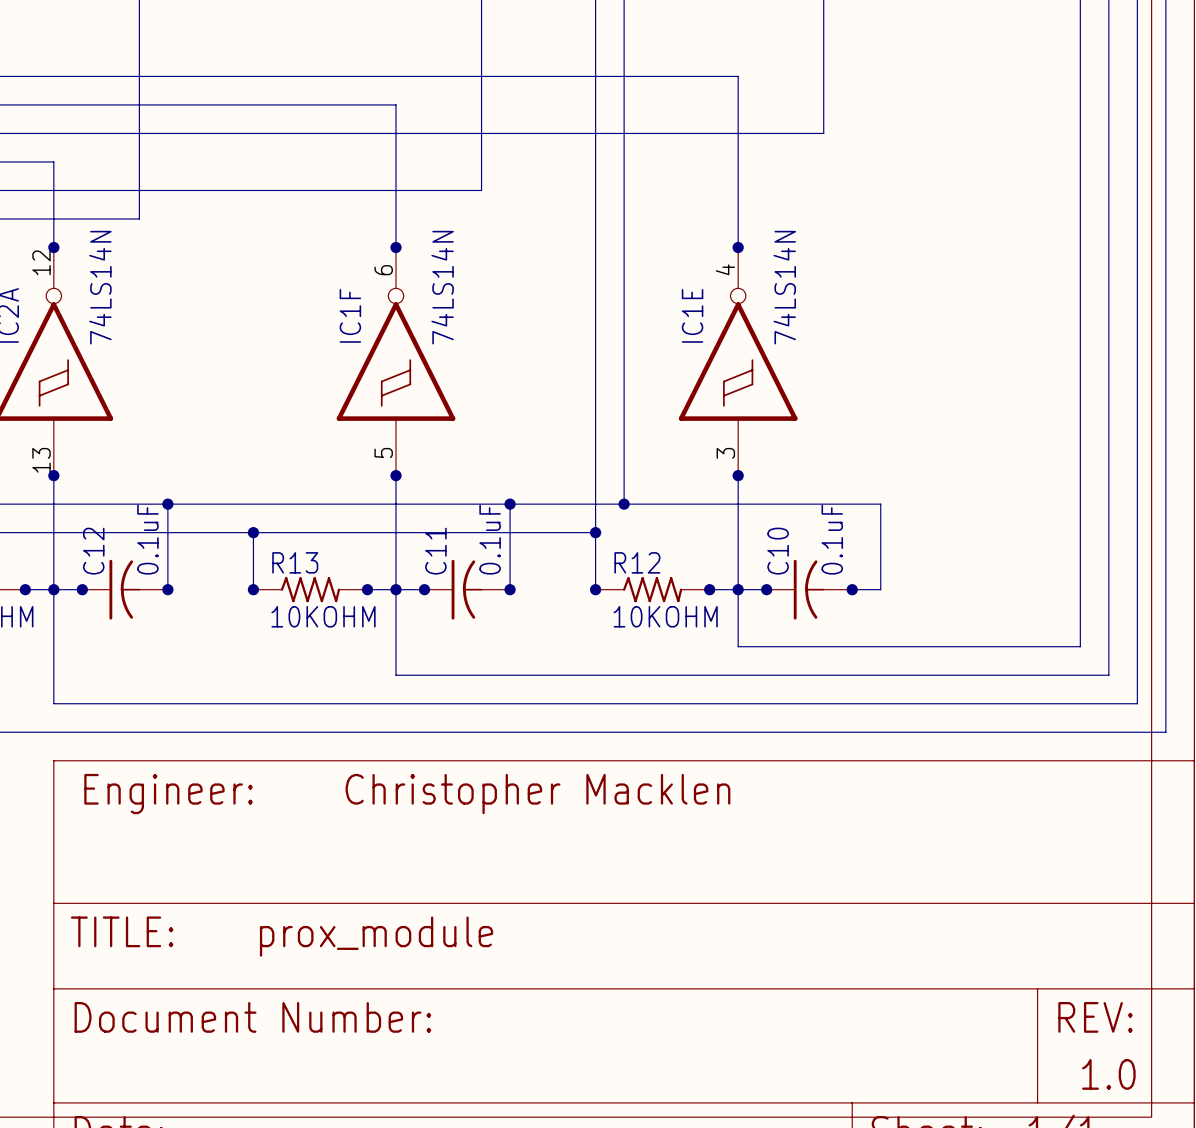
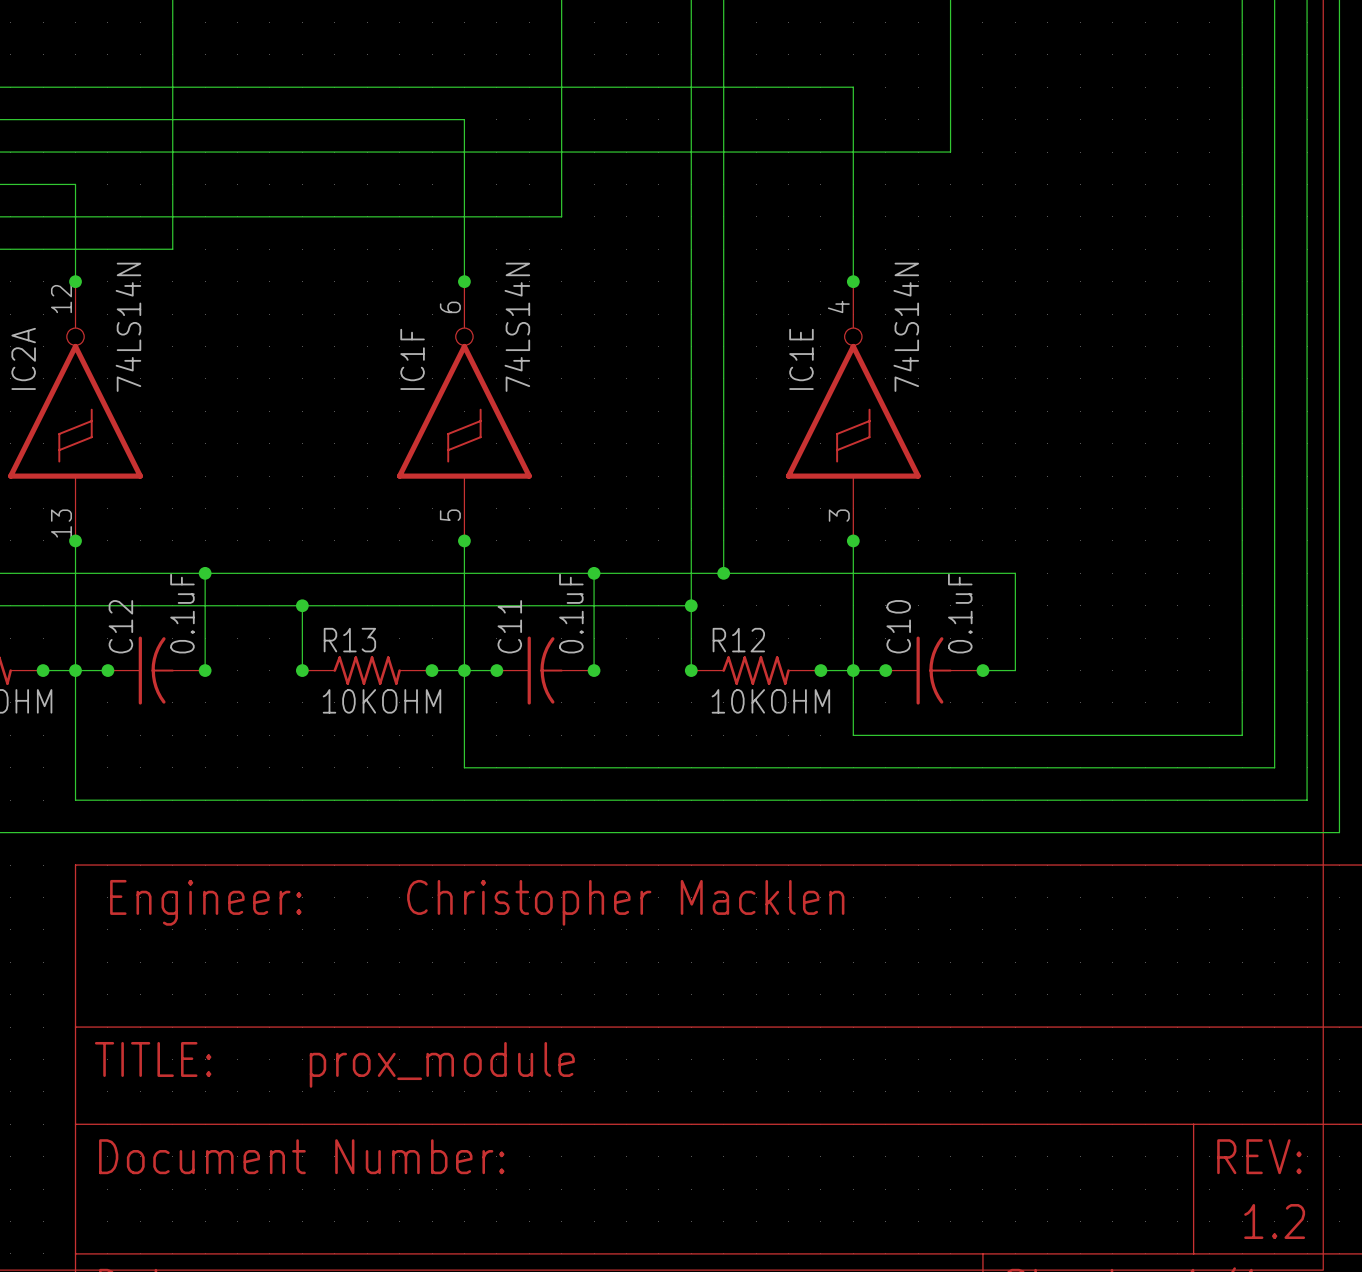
text: 1.0 (1108, 1074) -> 1.2 (1274, 1221)

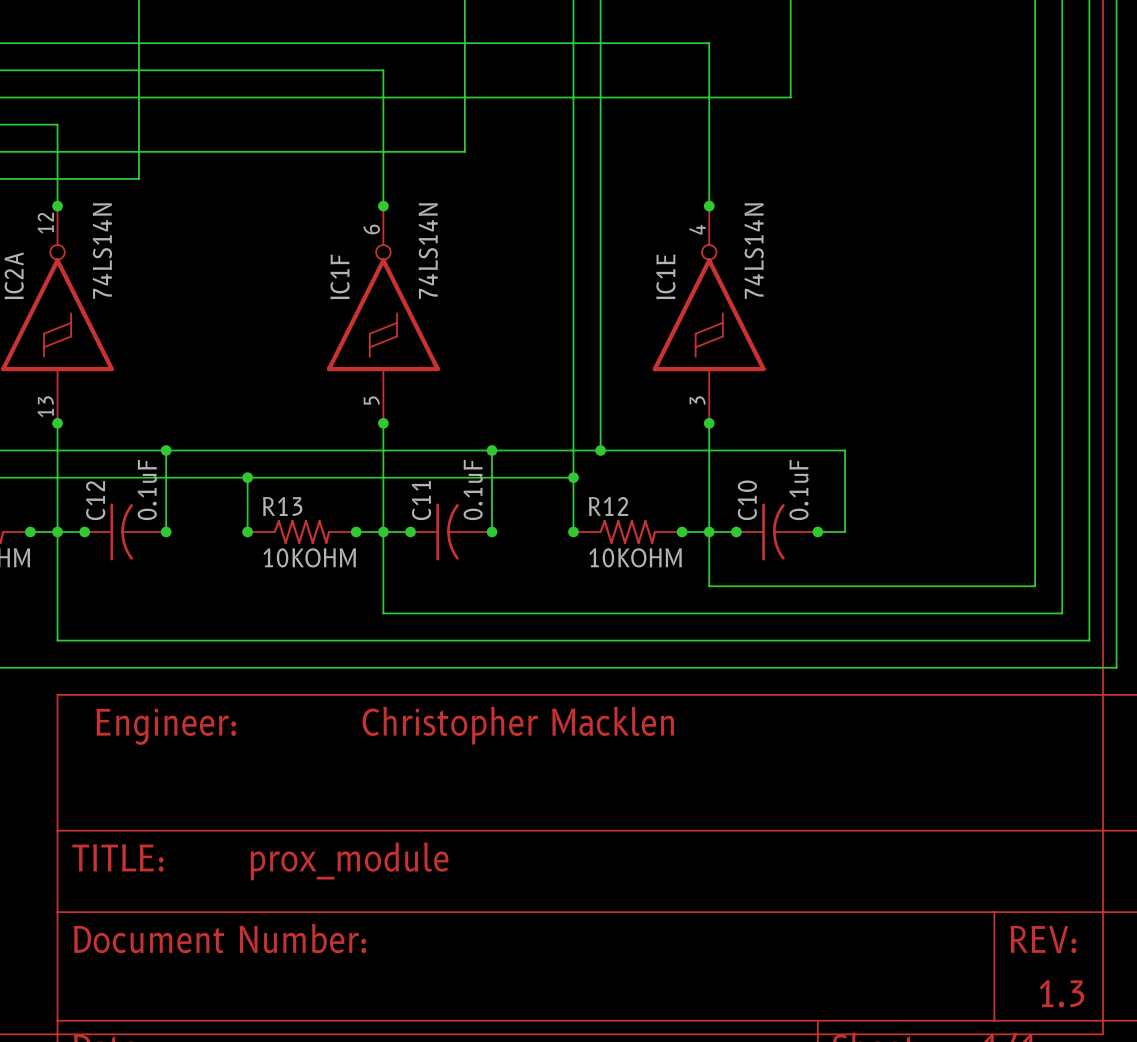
text: 1.2 (1274, 1221) -> 1.3 (1061, 993)

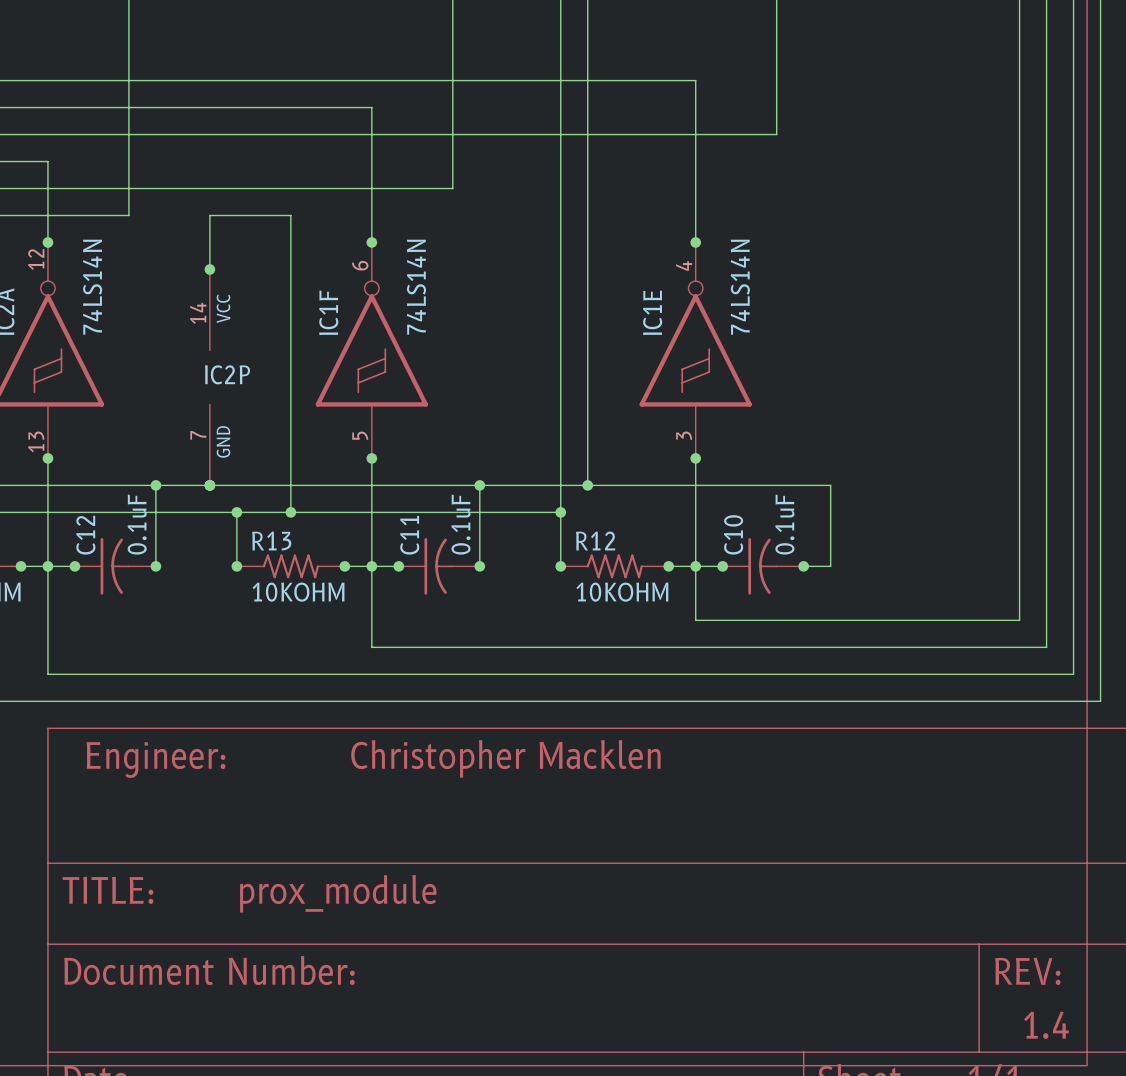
wire: none -> (209, 269) (209, 215) (290, 215) (290, 512)
junction: none -> (209, 269)
IC2P: none -> (209, 377)
junction: none -> (209, 485)
junction: none -> (290, 512)
text: 1.3 (1061, 993) -> 1.4 (1046, 1025)

